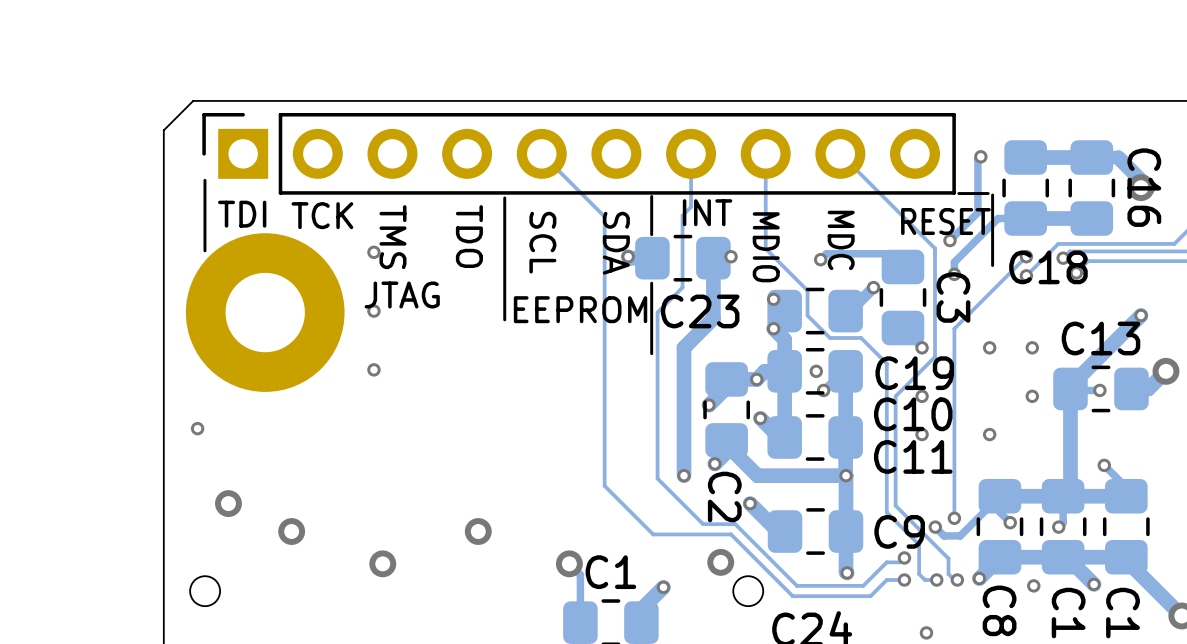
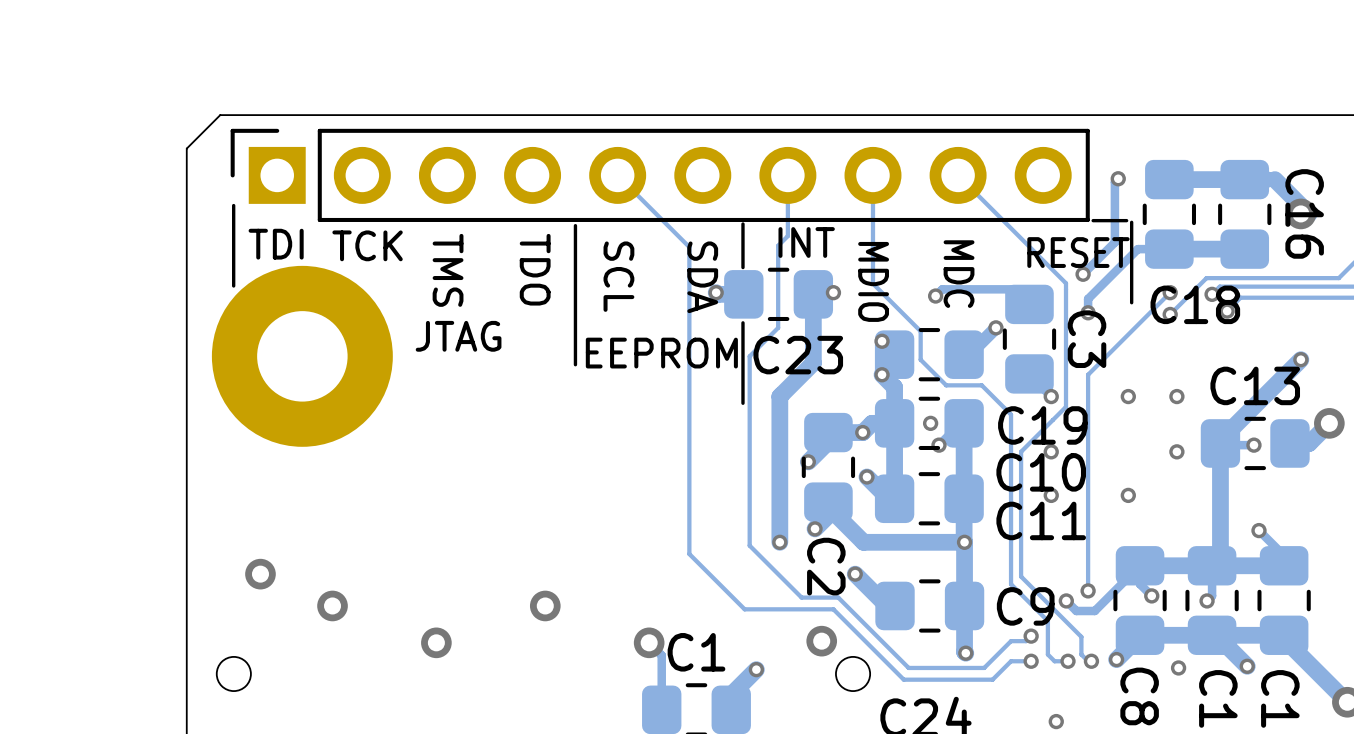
via: (373, 252) -> none
via: (373, 311) -> none
via: (373, 369) -> none
via: (197, 428) -> none

